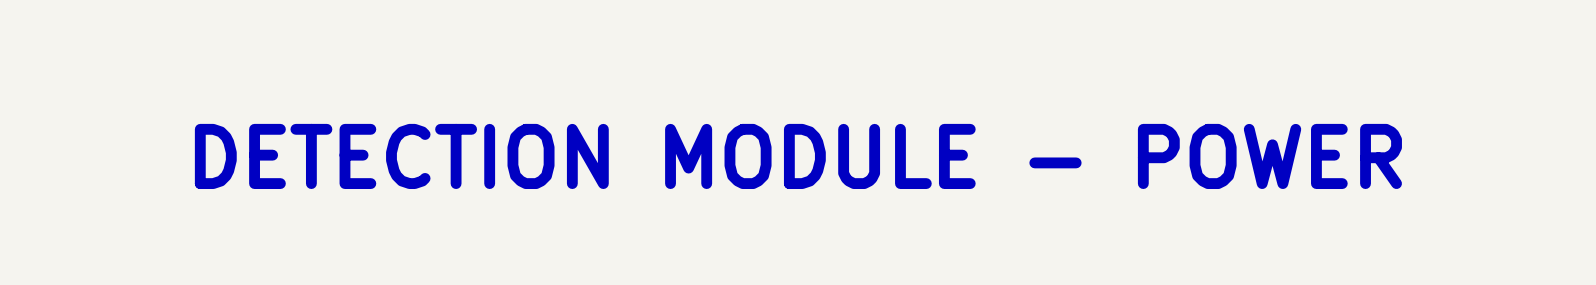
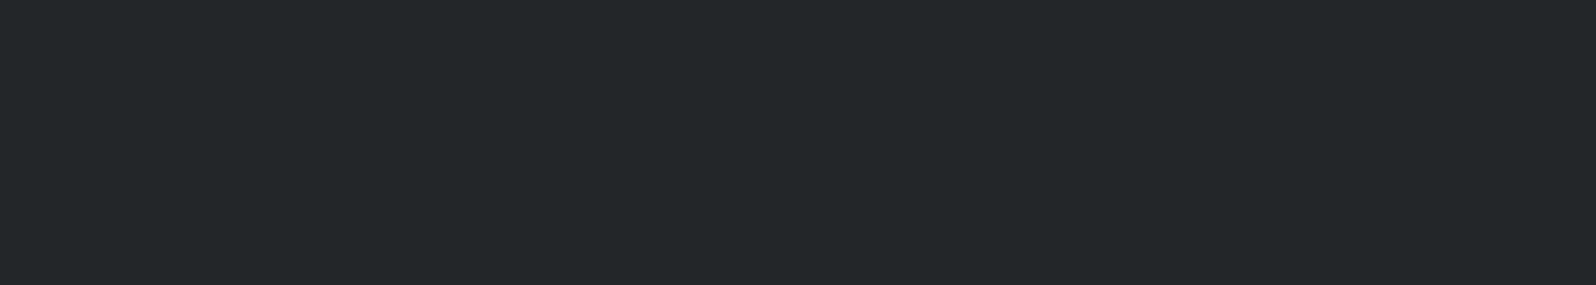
text: DETECTION MODULE - POWER (798, 156) -> none

